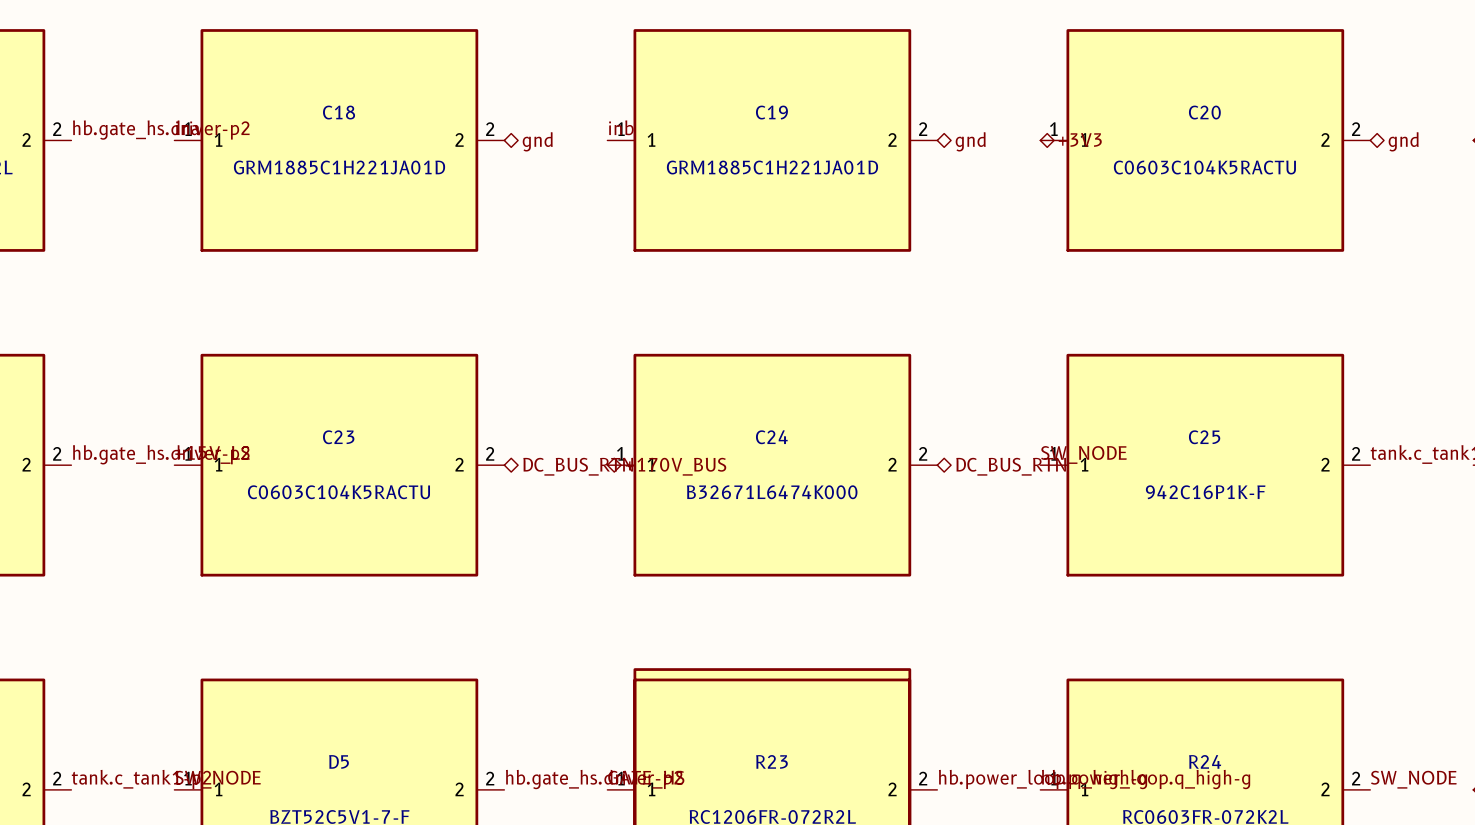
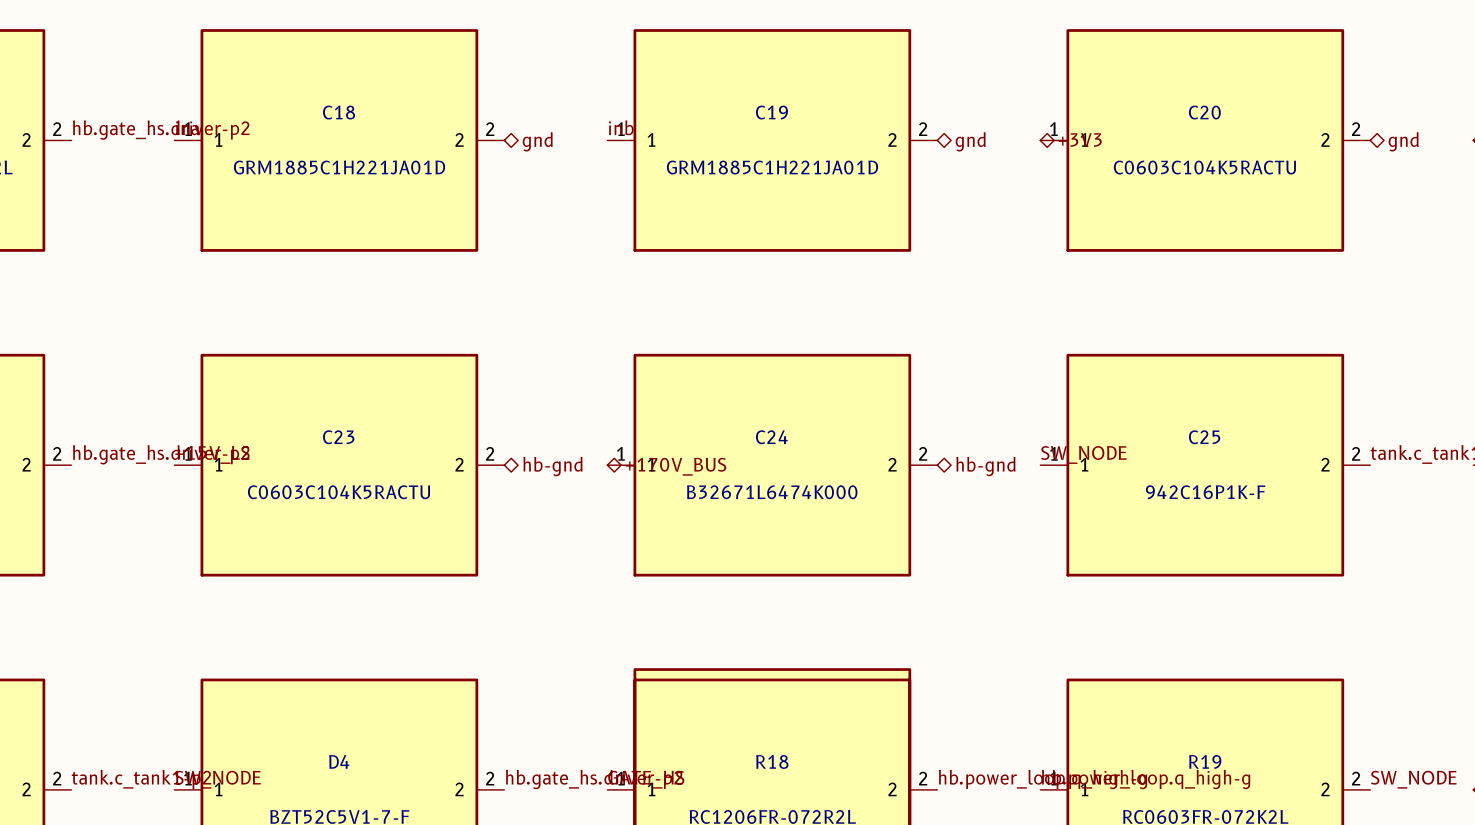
hierarchical label: DC_BUS_RTN (578, 466) -> hb-gnd (553, 466)
hierarchical label: DC_BUS_RTN (1011, 466) -> hb-gnd (985, 466)
D5 name: D5 (339, 761) -> D4 (339, 761)
R23 name: R23 (771, 761) -> R18 (772, 761)
R24 name: R24 (1205, 761) -> R19 (1205, 761)

